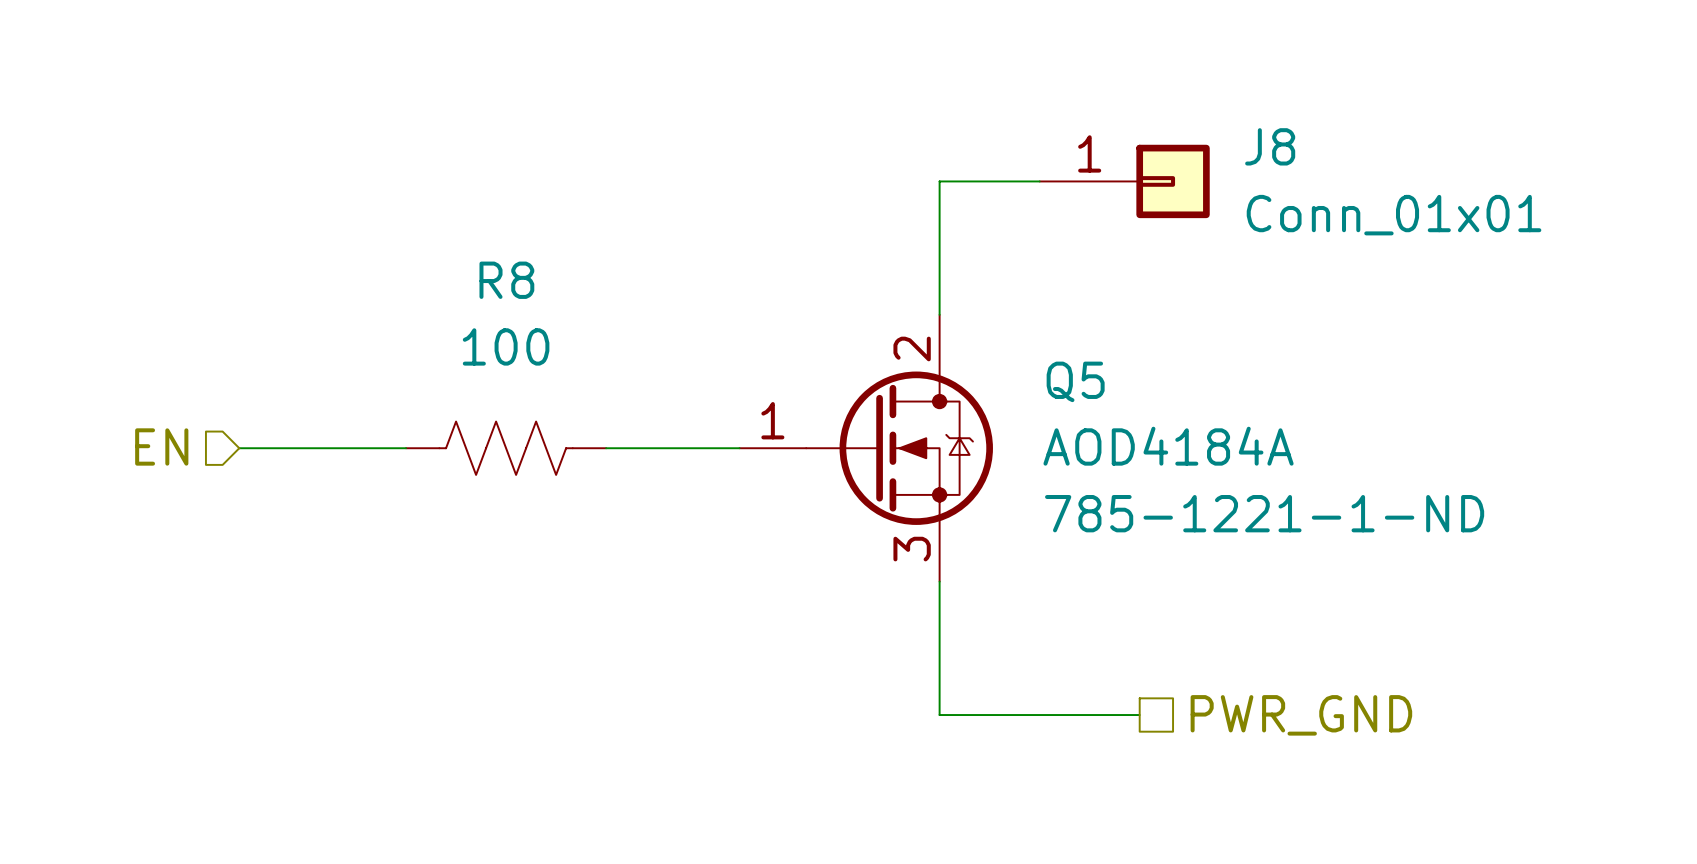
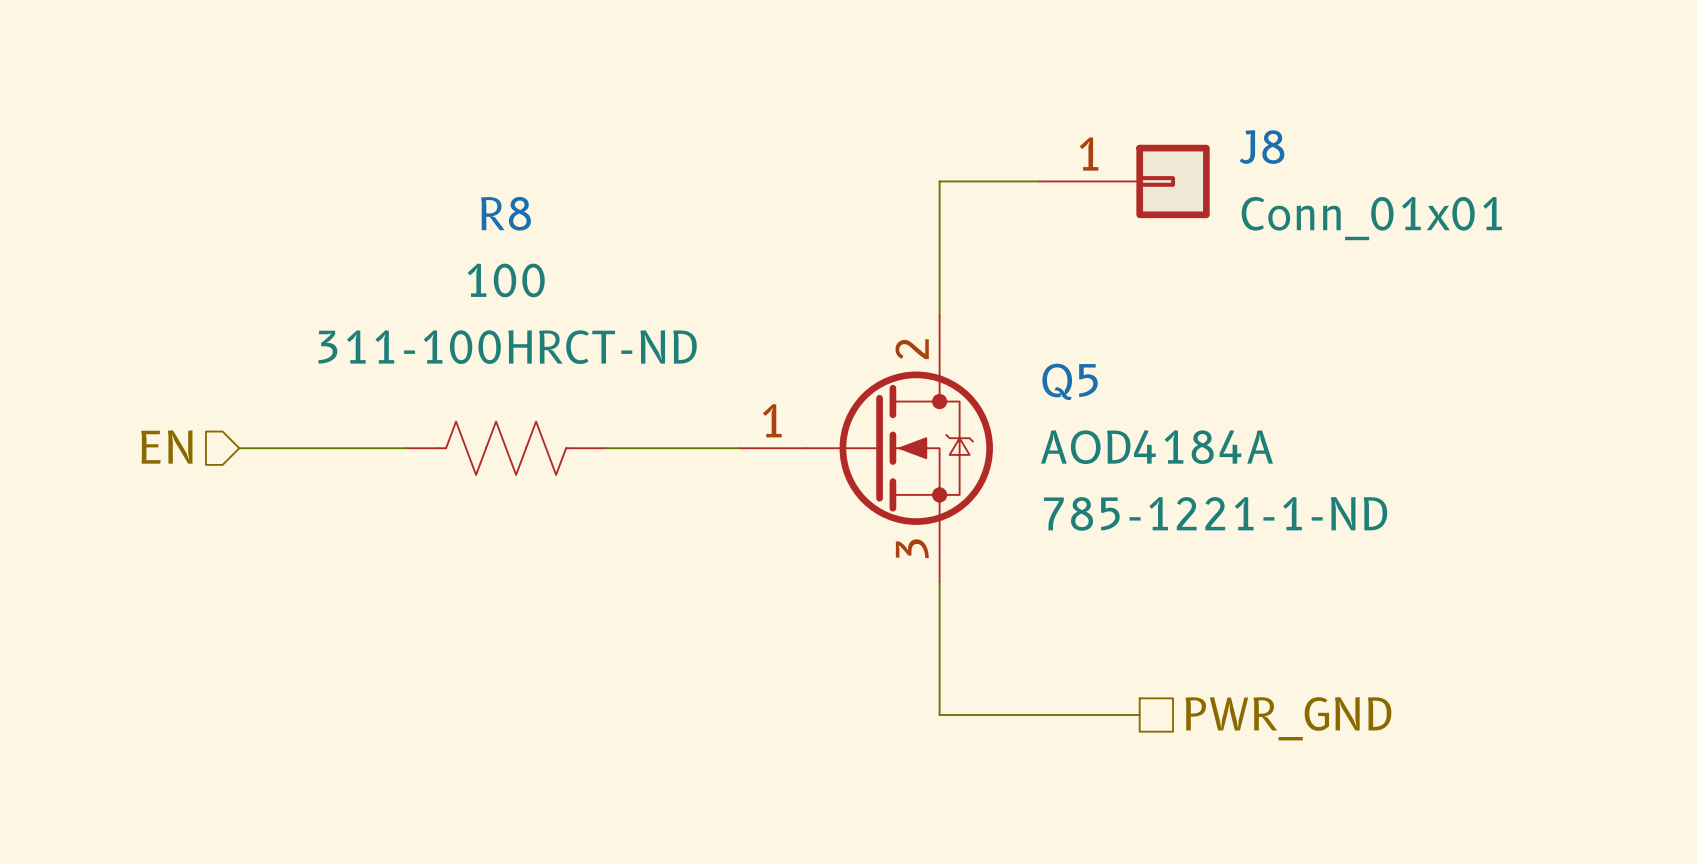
R8 name position: R8 (506, 280) -> R8 (505, 213)
R8 text: none -> 311-100HRCT-ND (507, 347)
R8 value position: 100 (506, 346) -> 100 (506, 280)

